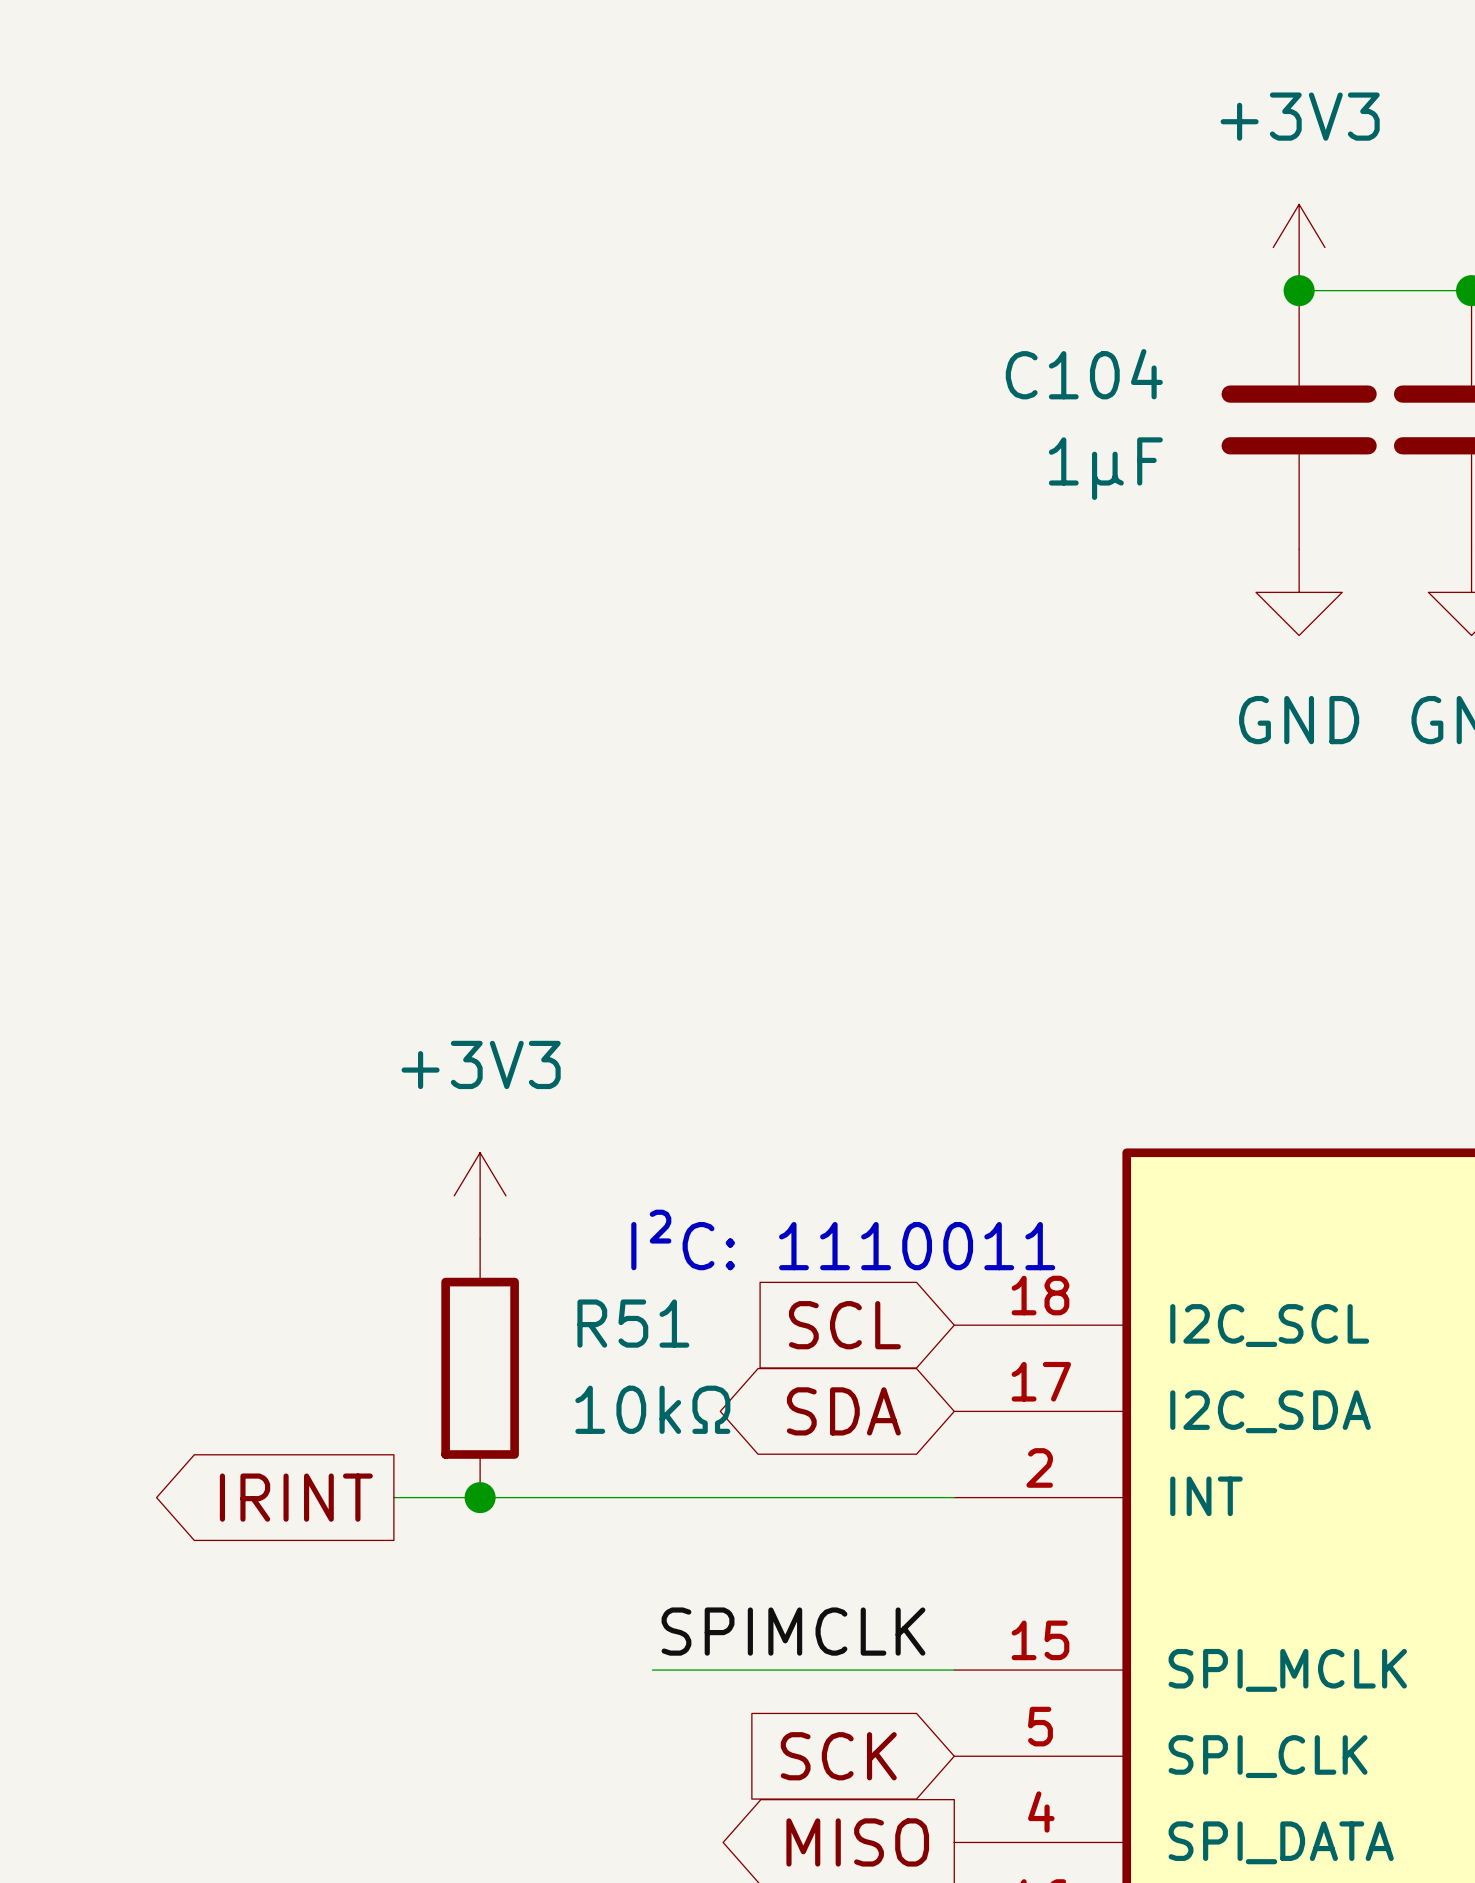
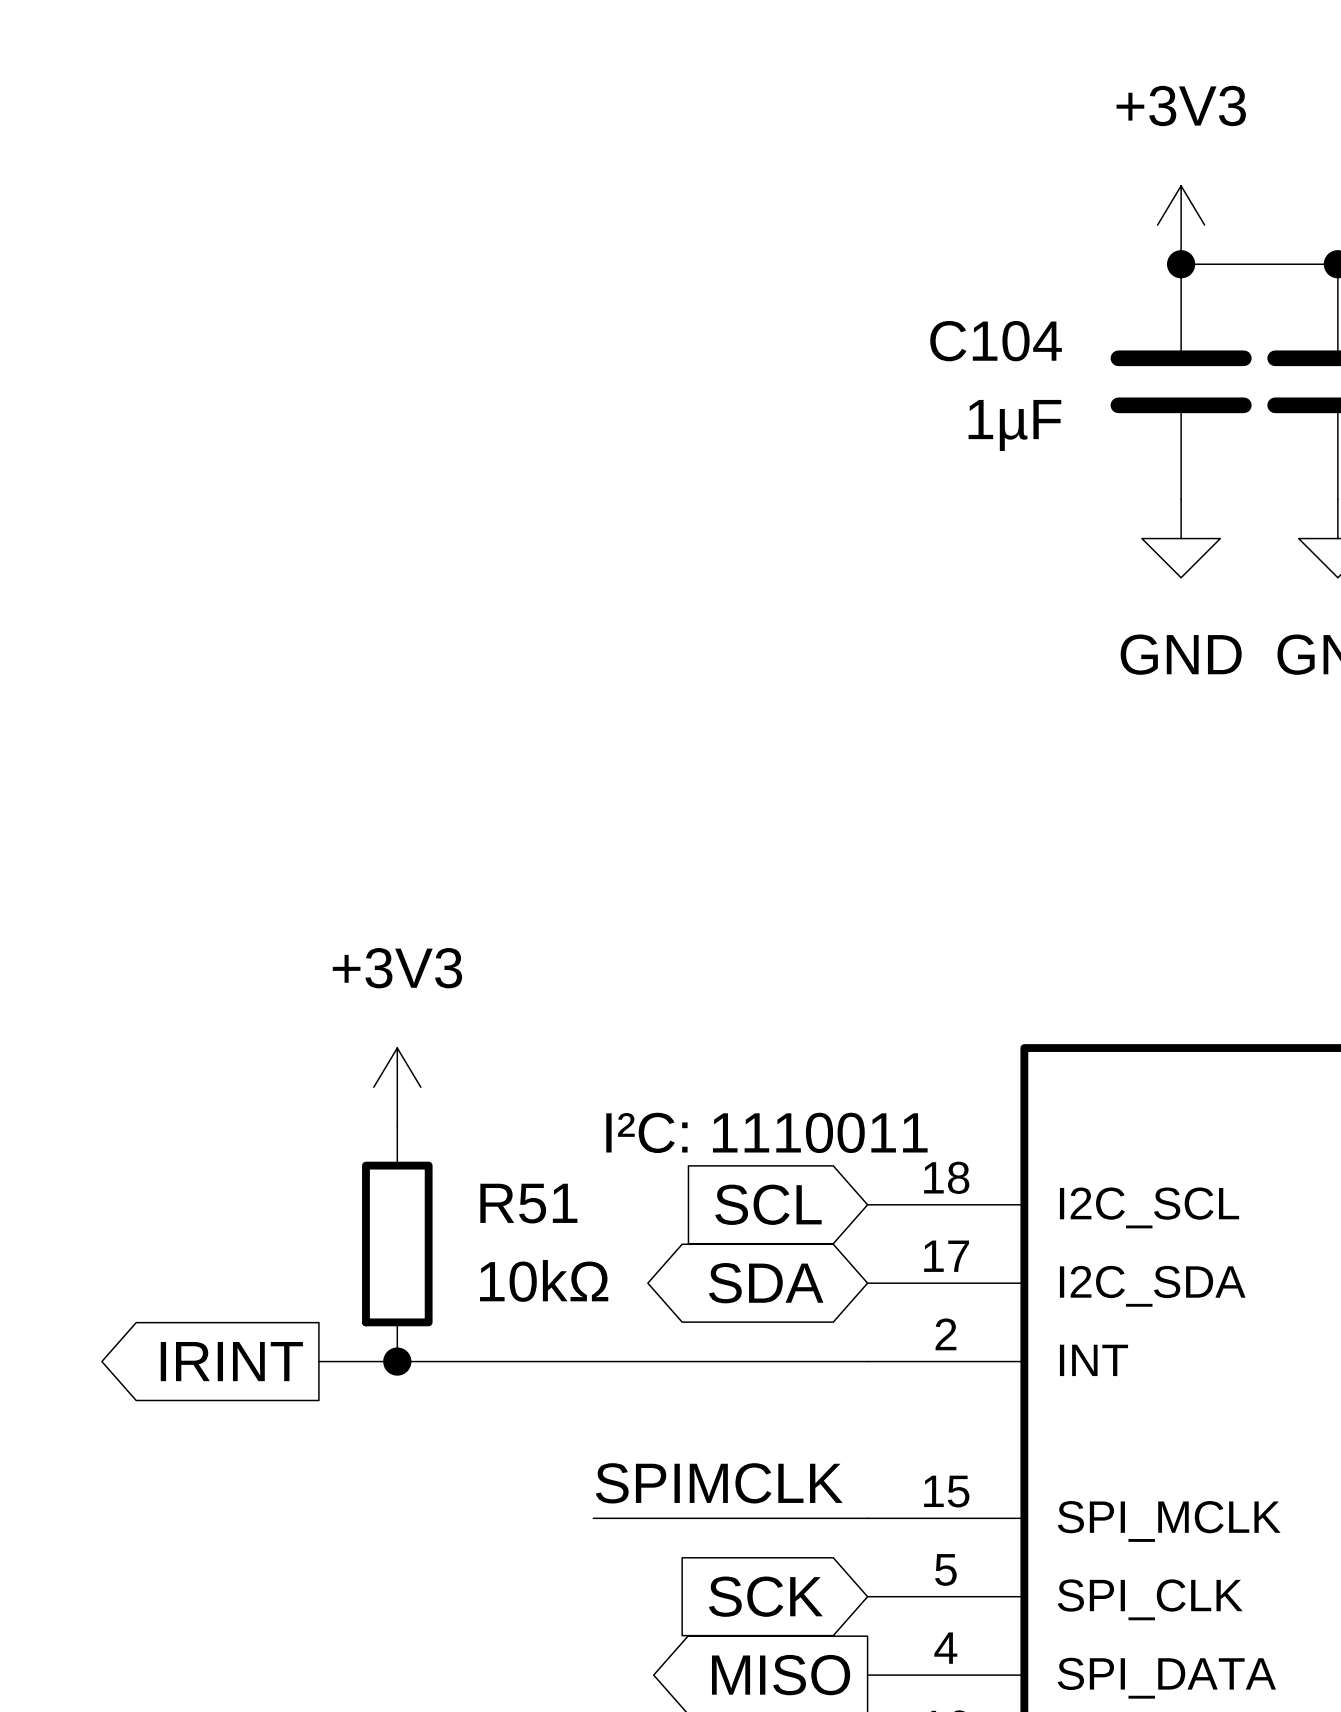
power symbol position: +3V3 (480, 1195) -> +3V3 (397, 1087)
R51 position: (480, 1368) -> (397, 1243)
global label position: IRINT (296, 1497) -> IRINT (231, 1361)
wire: none -> (318, 1361) (358, 1361)
junction position: (480, 1497) -> (397, 1361)

